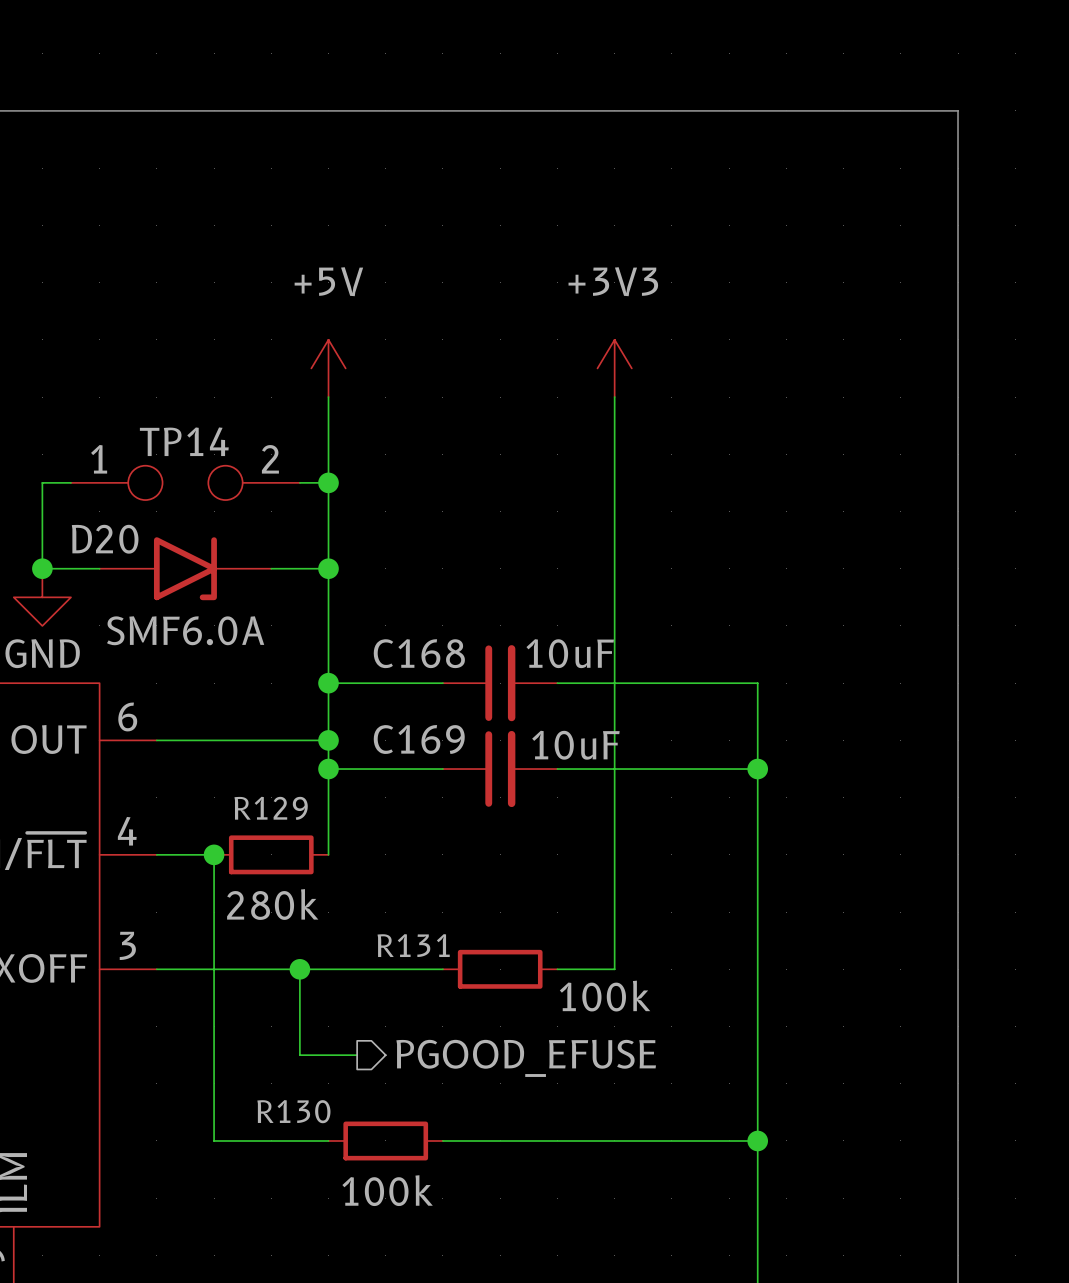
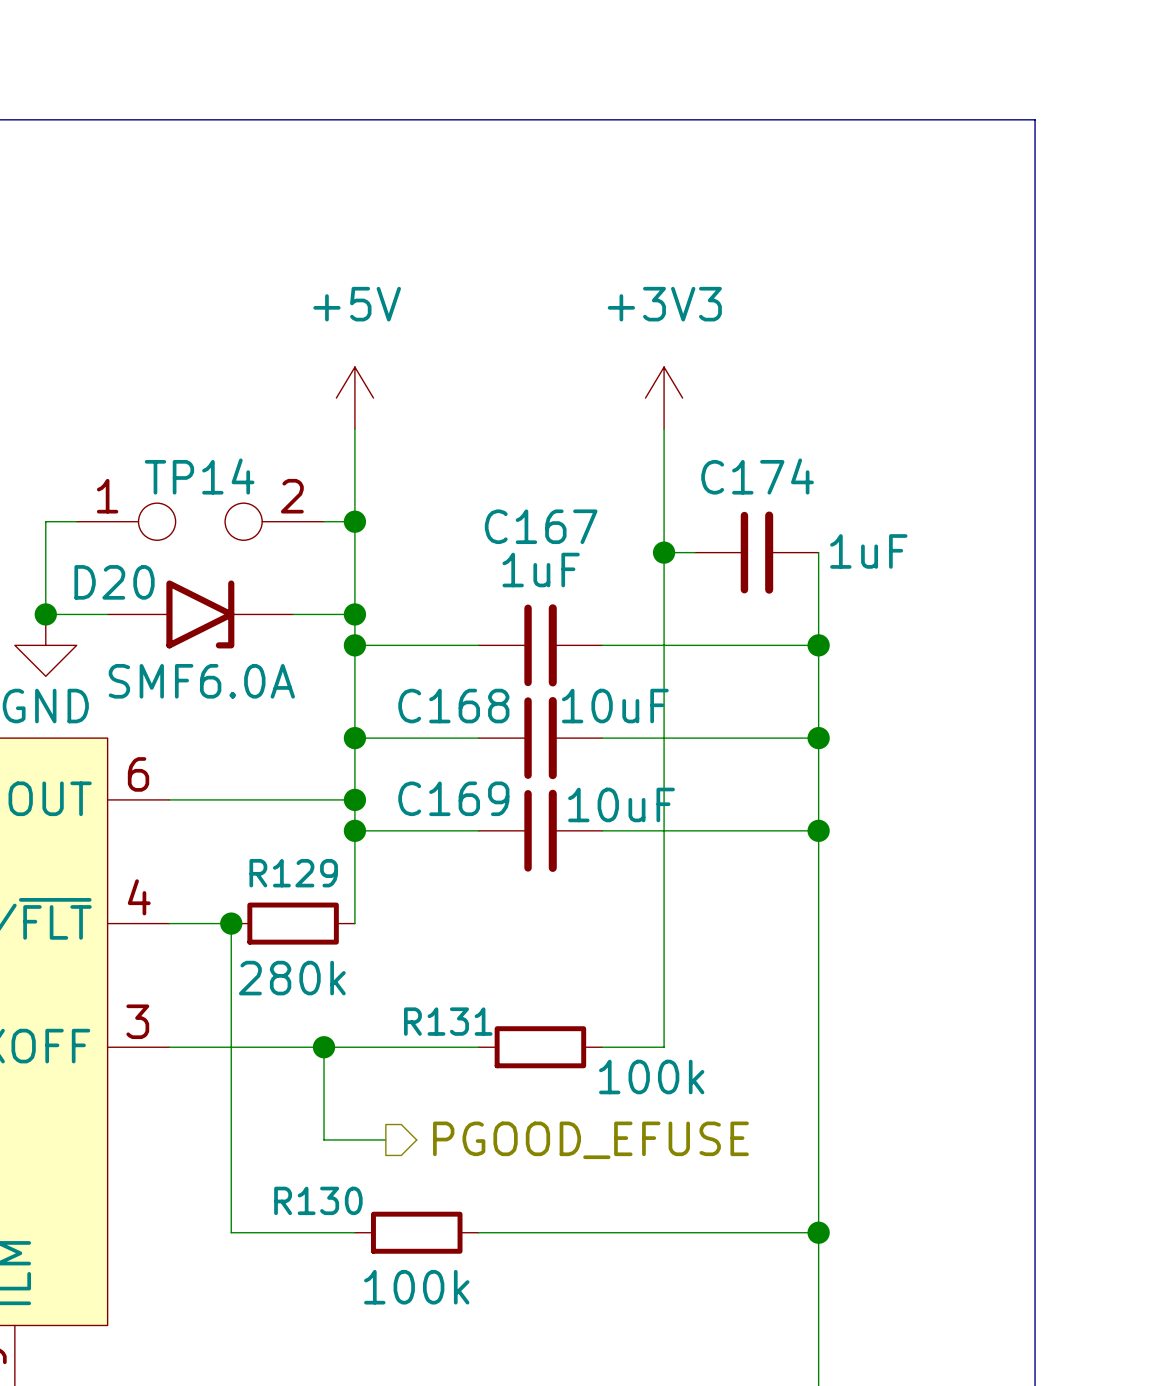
wire: none -> (664, 552) (694, 552)
junction: none -> (664, 552)
C174: none -> 1uF (756, 552)
wire: none -> (818, 552) (818, 738)
wire: none -> (354, 645) (478, 645)
junction: none -> (354, 645)
C167: none -> 1uF (540, 645)
wire: none -> (602, 645) (818, 645)
junction: none -> (818, 645)
junction: none -> (818, 738)

